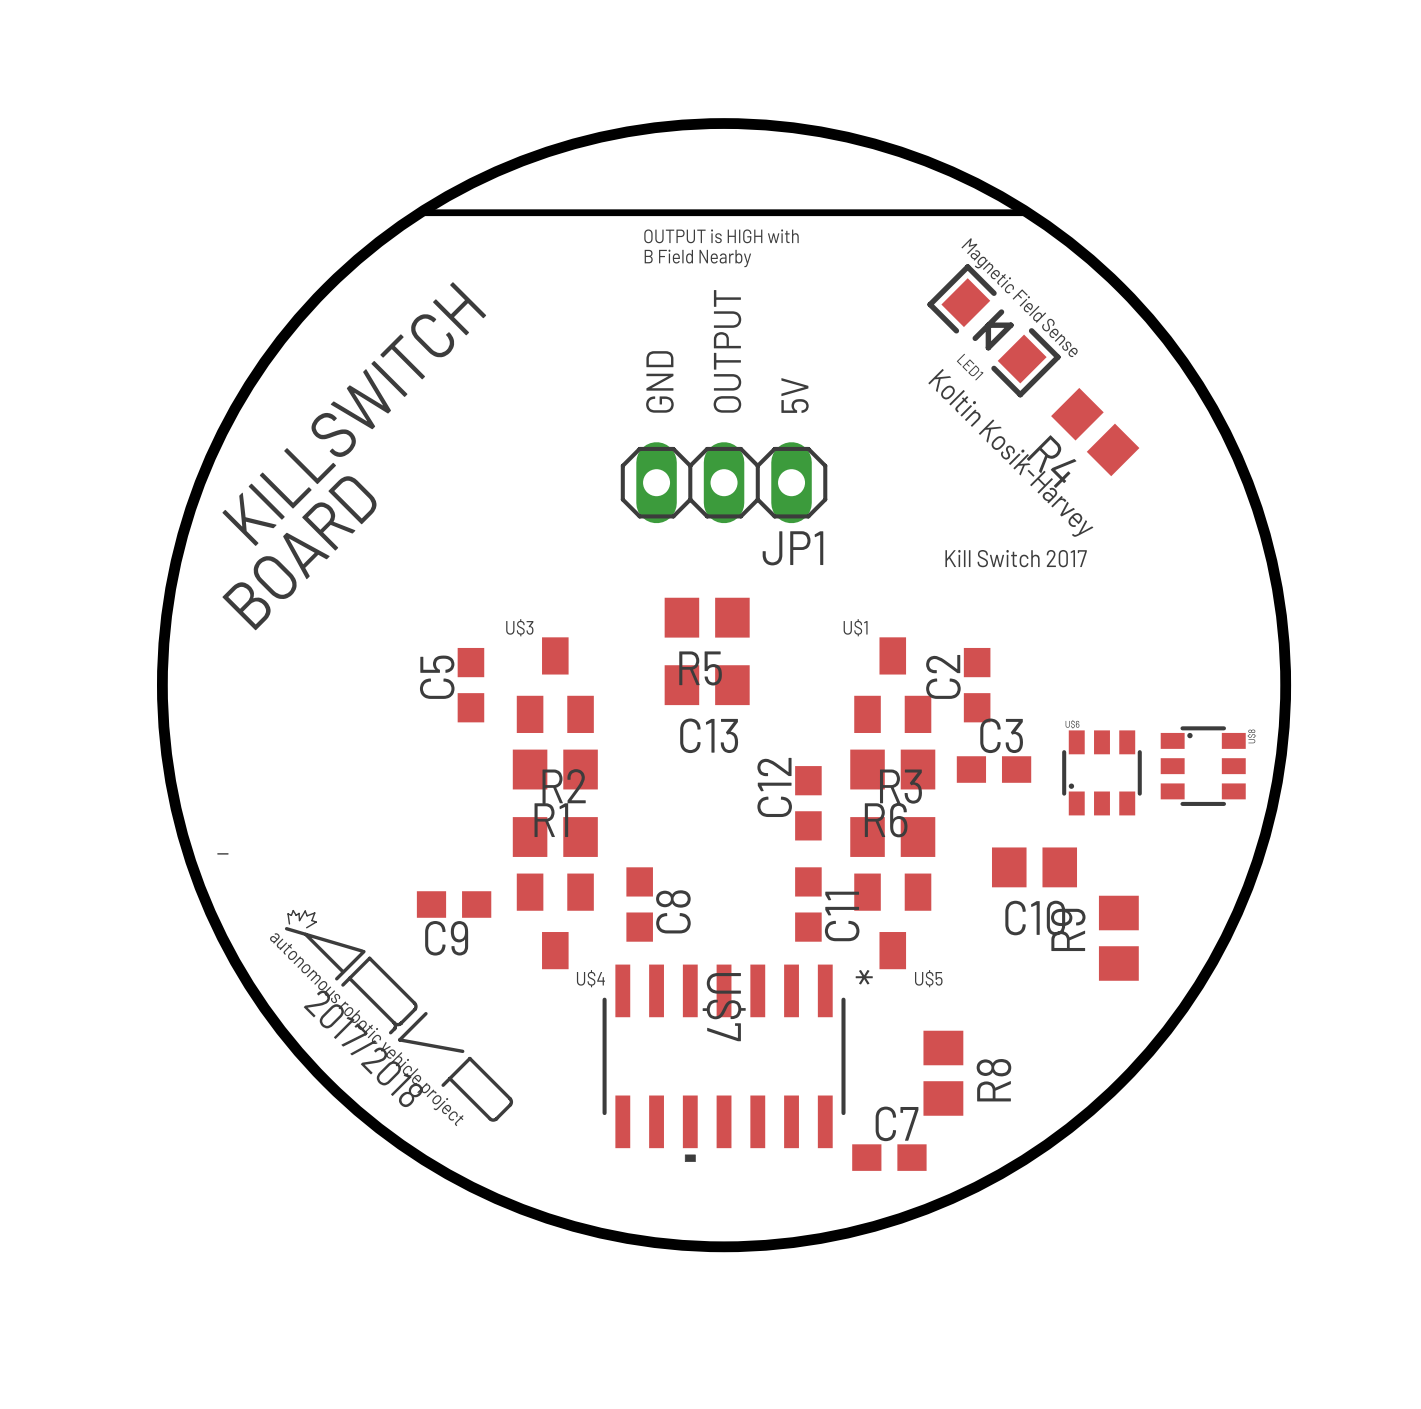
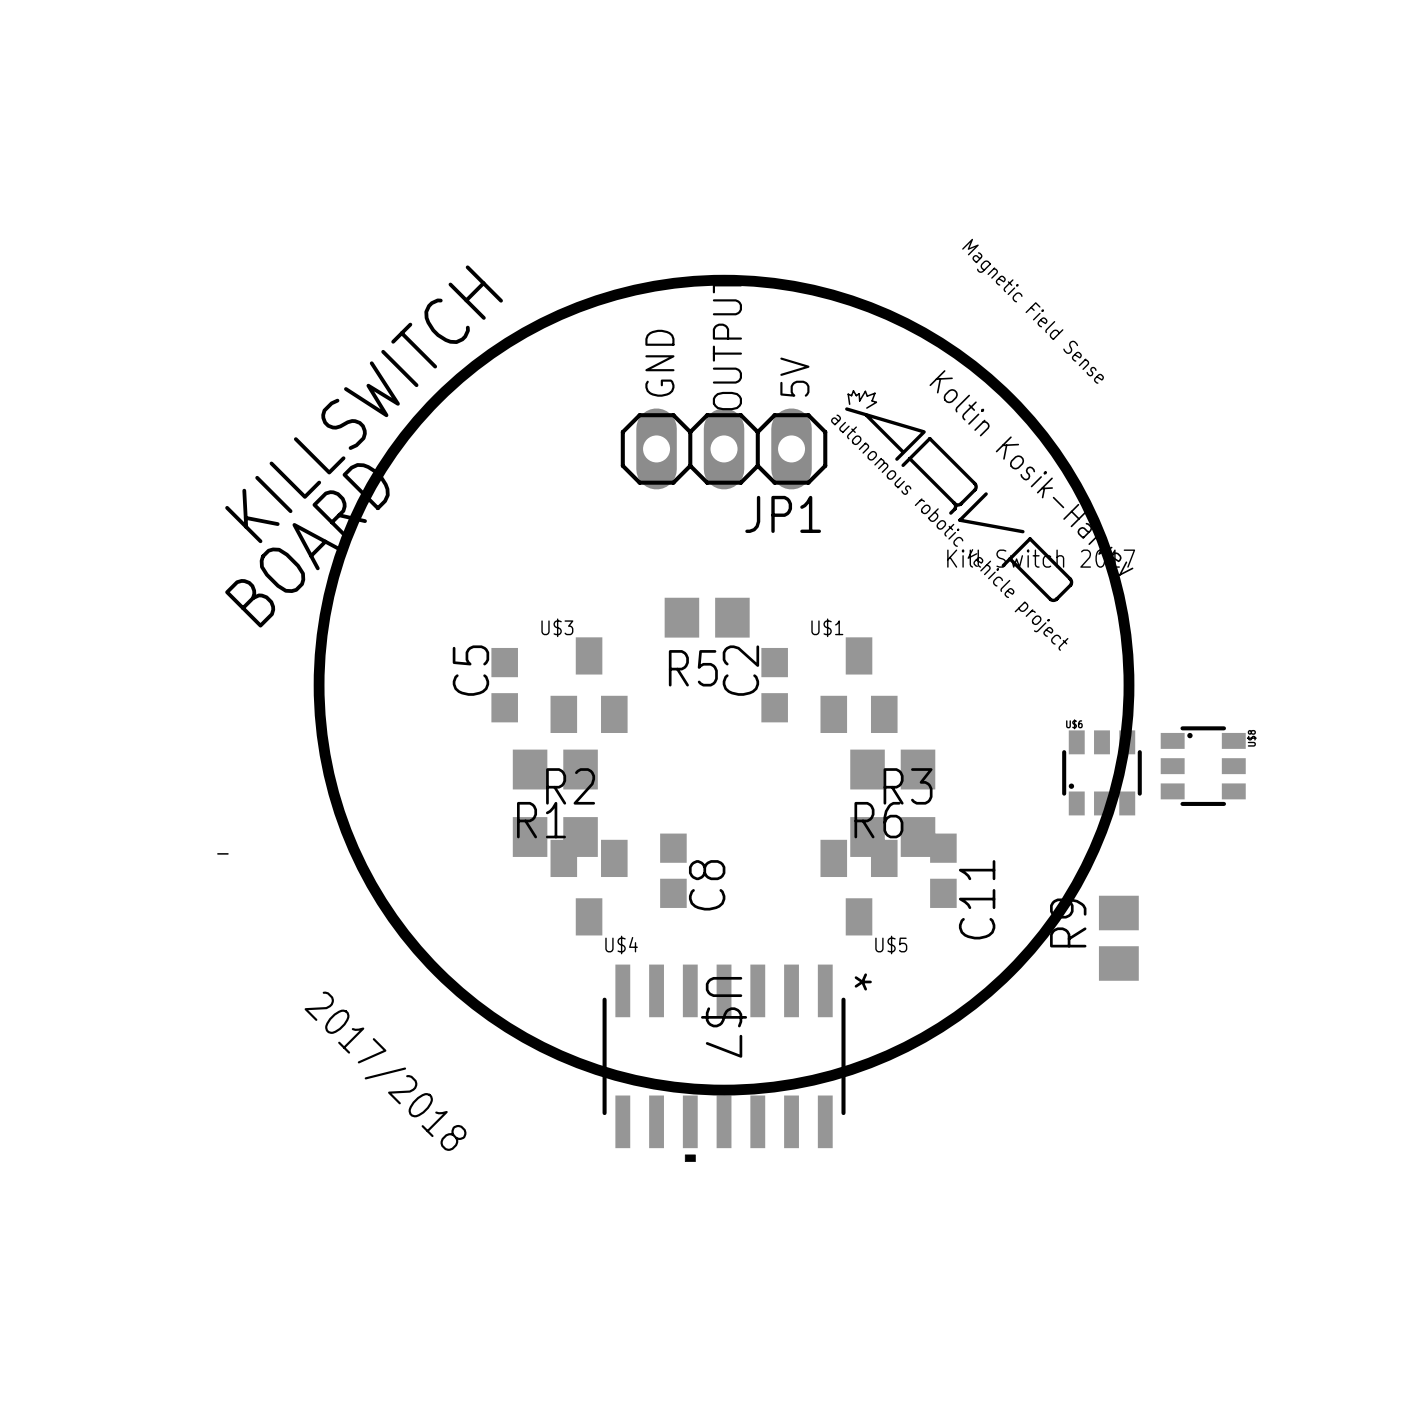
round board edge size: [157, 118, 1292, 1253] -> [313, 274, 1135, 1096]
board edge: (420, 212) (1027, 212) -> none
text: OUTPUT is HIGH with (721, 236) -> none
text: B Field Nearby (697, 258) -> none
LED1: (994, 330) -> none
text position: GND (659, 381) -> GND (659, 363)
drawing: none -> [845, 390, 1074, 603]
text position: 5V (795, 395) -> 5V (794, 377)
R4: (1095, 432) -> none
JP1 position: (724, 482) -> (724, 448)
C5 position: (470, 685) -> (504, 685)
U$3 position: (555, 685) -> (589, 685)
C13: (707, 685) -> none
U$1 position: (892, 685) -> (859, 685)
C2 position: (977, 685) -> (774, 685)
C3: (994, 769) -> none
C12: (808, 803) -> none
C10: (1034, 867) -> none
C9: (454, 904) -> none
C8 position: (639, 904) -> (673, 870)
C11 position: (808, 904) -> (943, 870)
drawing: [284, 909, 514, 1122] -> none
U$4 position: (555, 921) -> (589, 887)
U$5 position: (892, 921) -> (859, 887)
R8: (943, 1073) -> none
C7: (889, 1157) -> none

